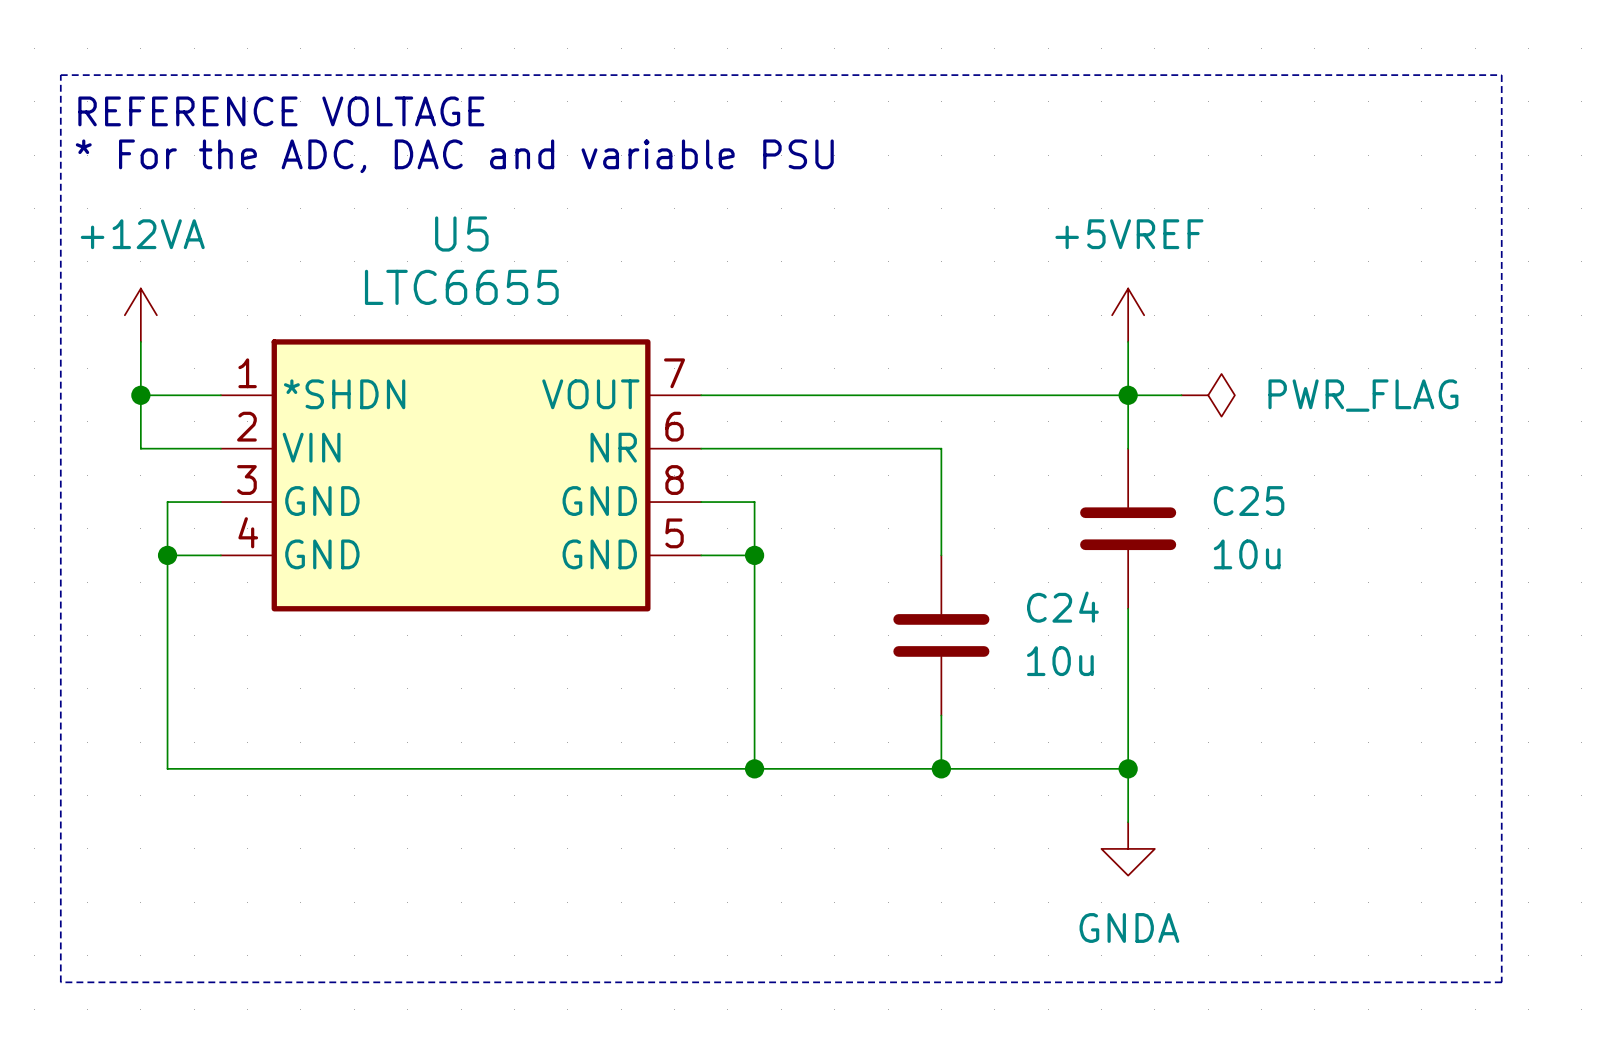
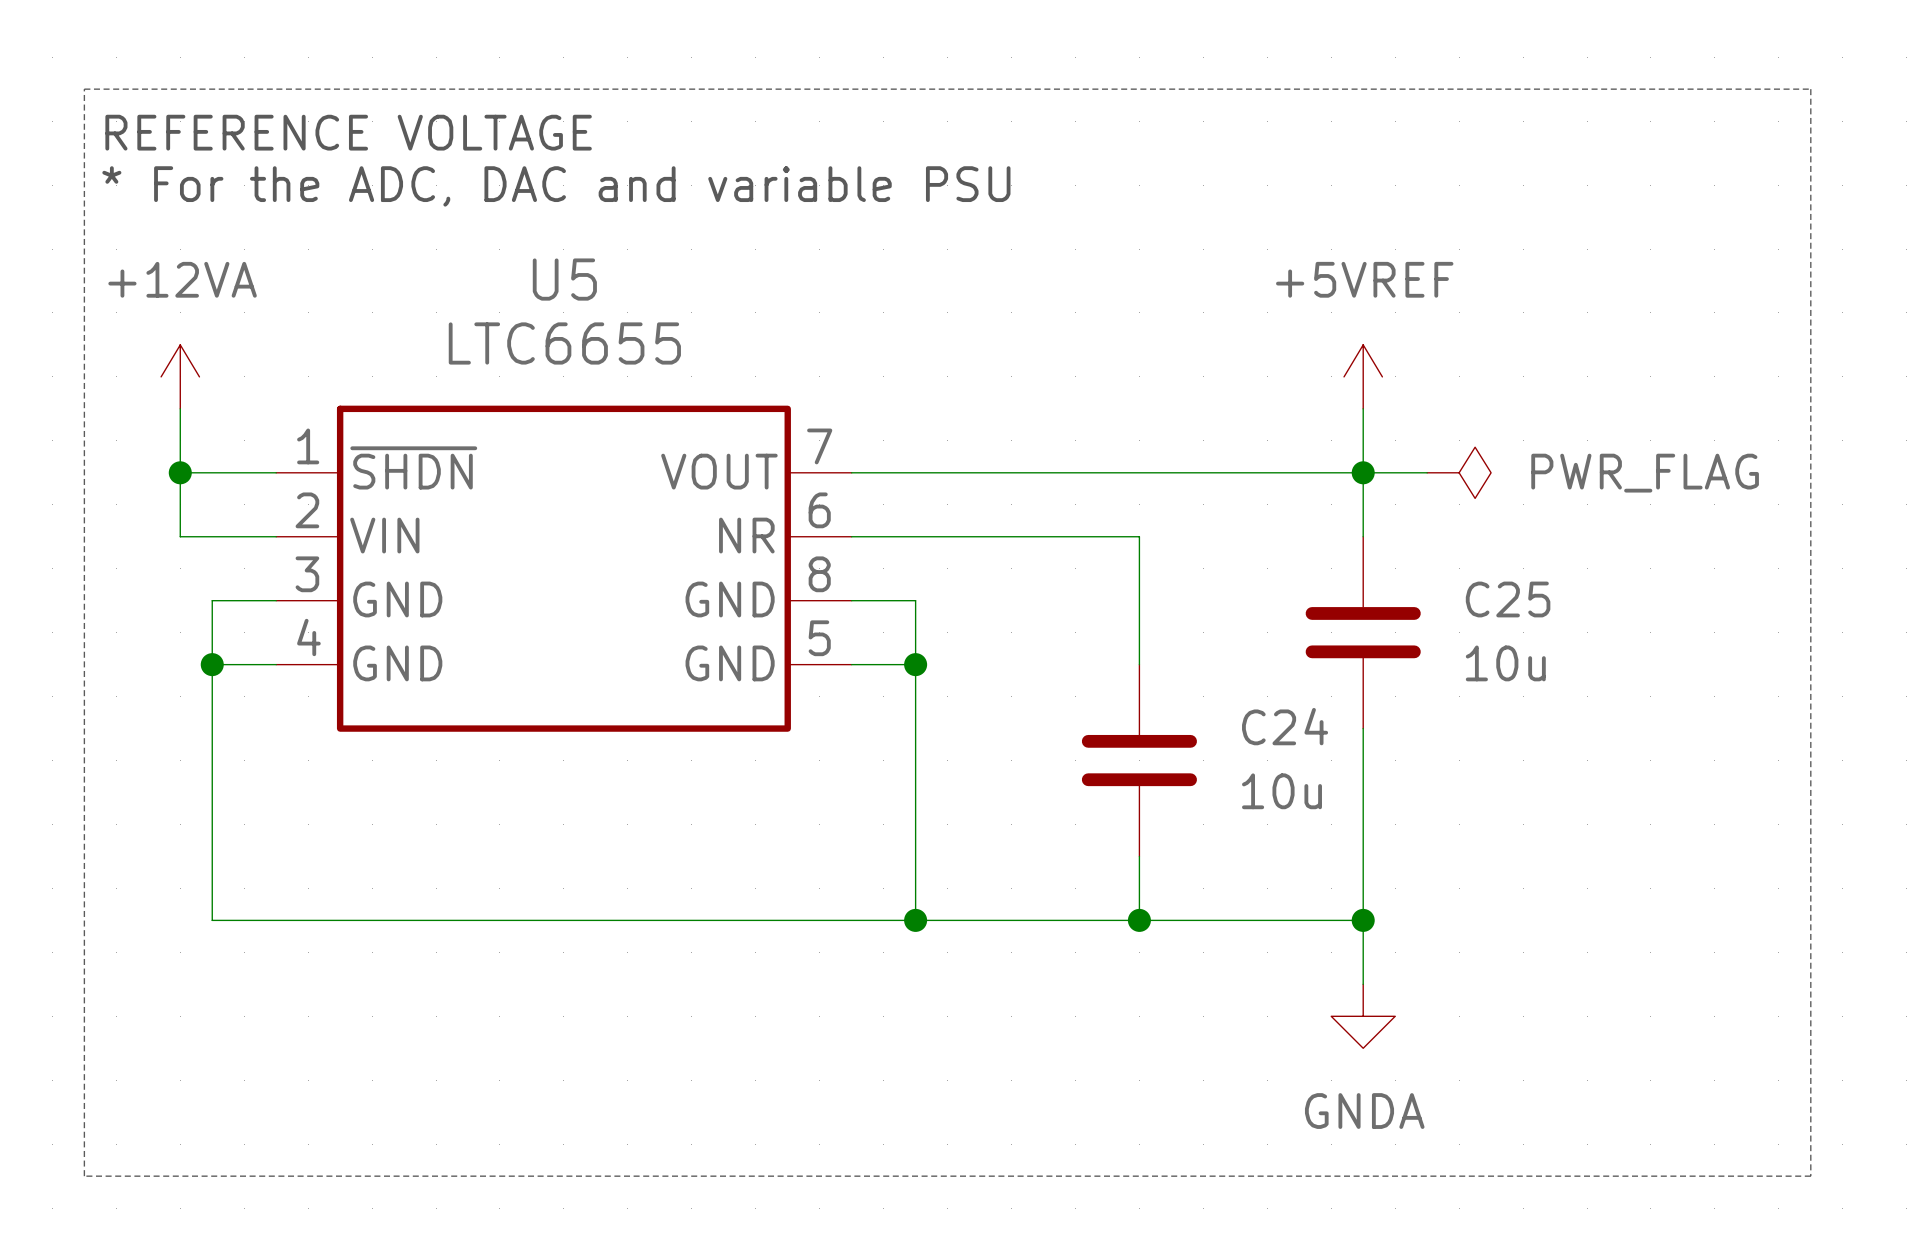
U5 pin name: *SHDN (344, 394) -> ~{SHDN} (413, 467)

